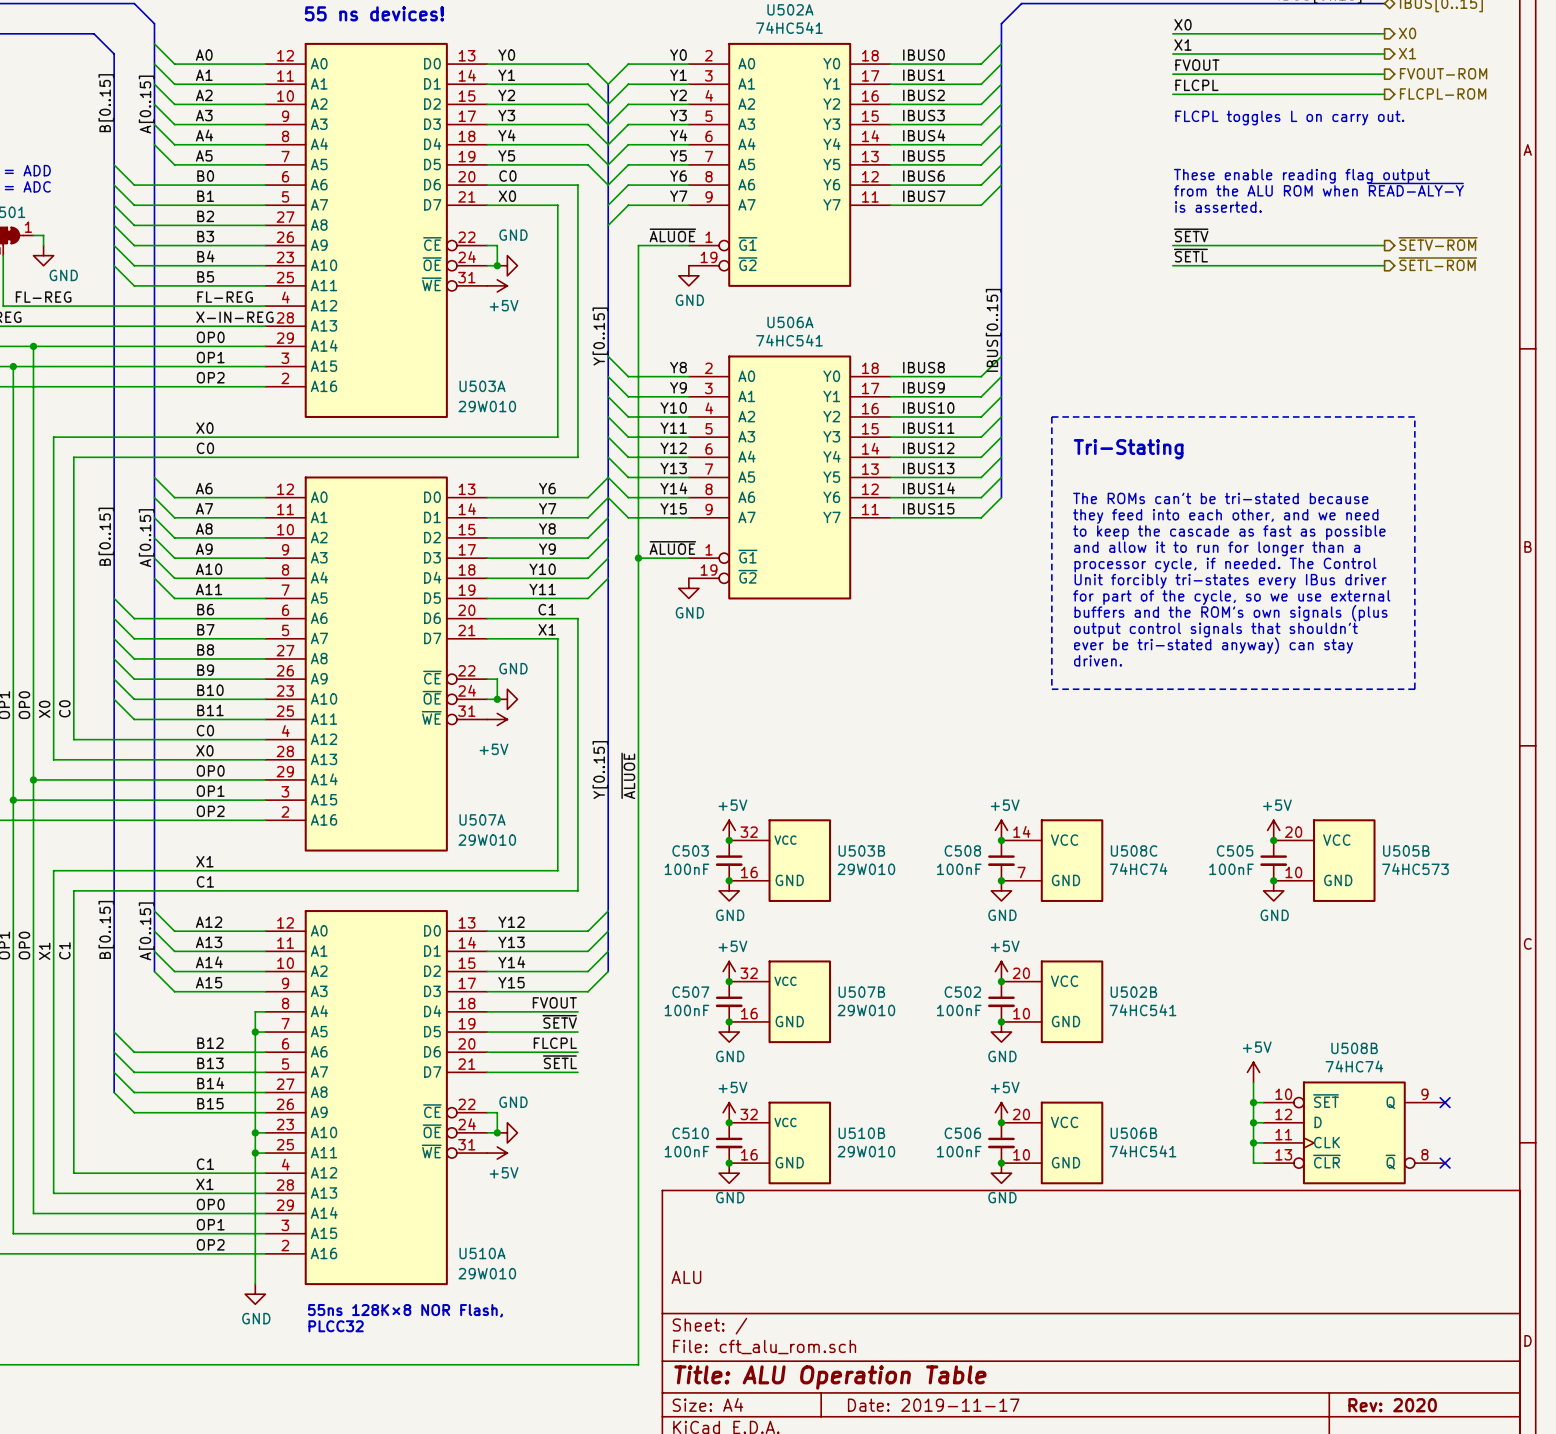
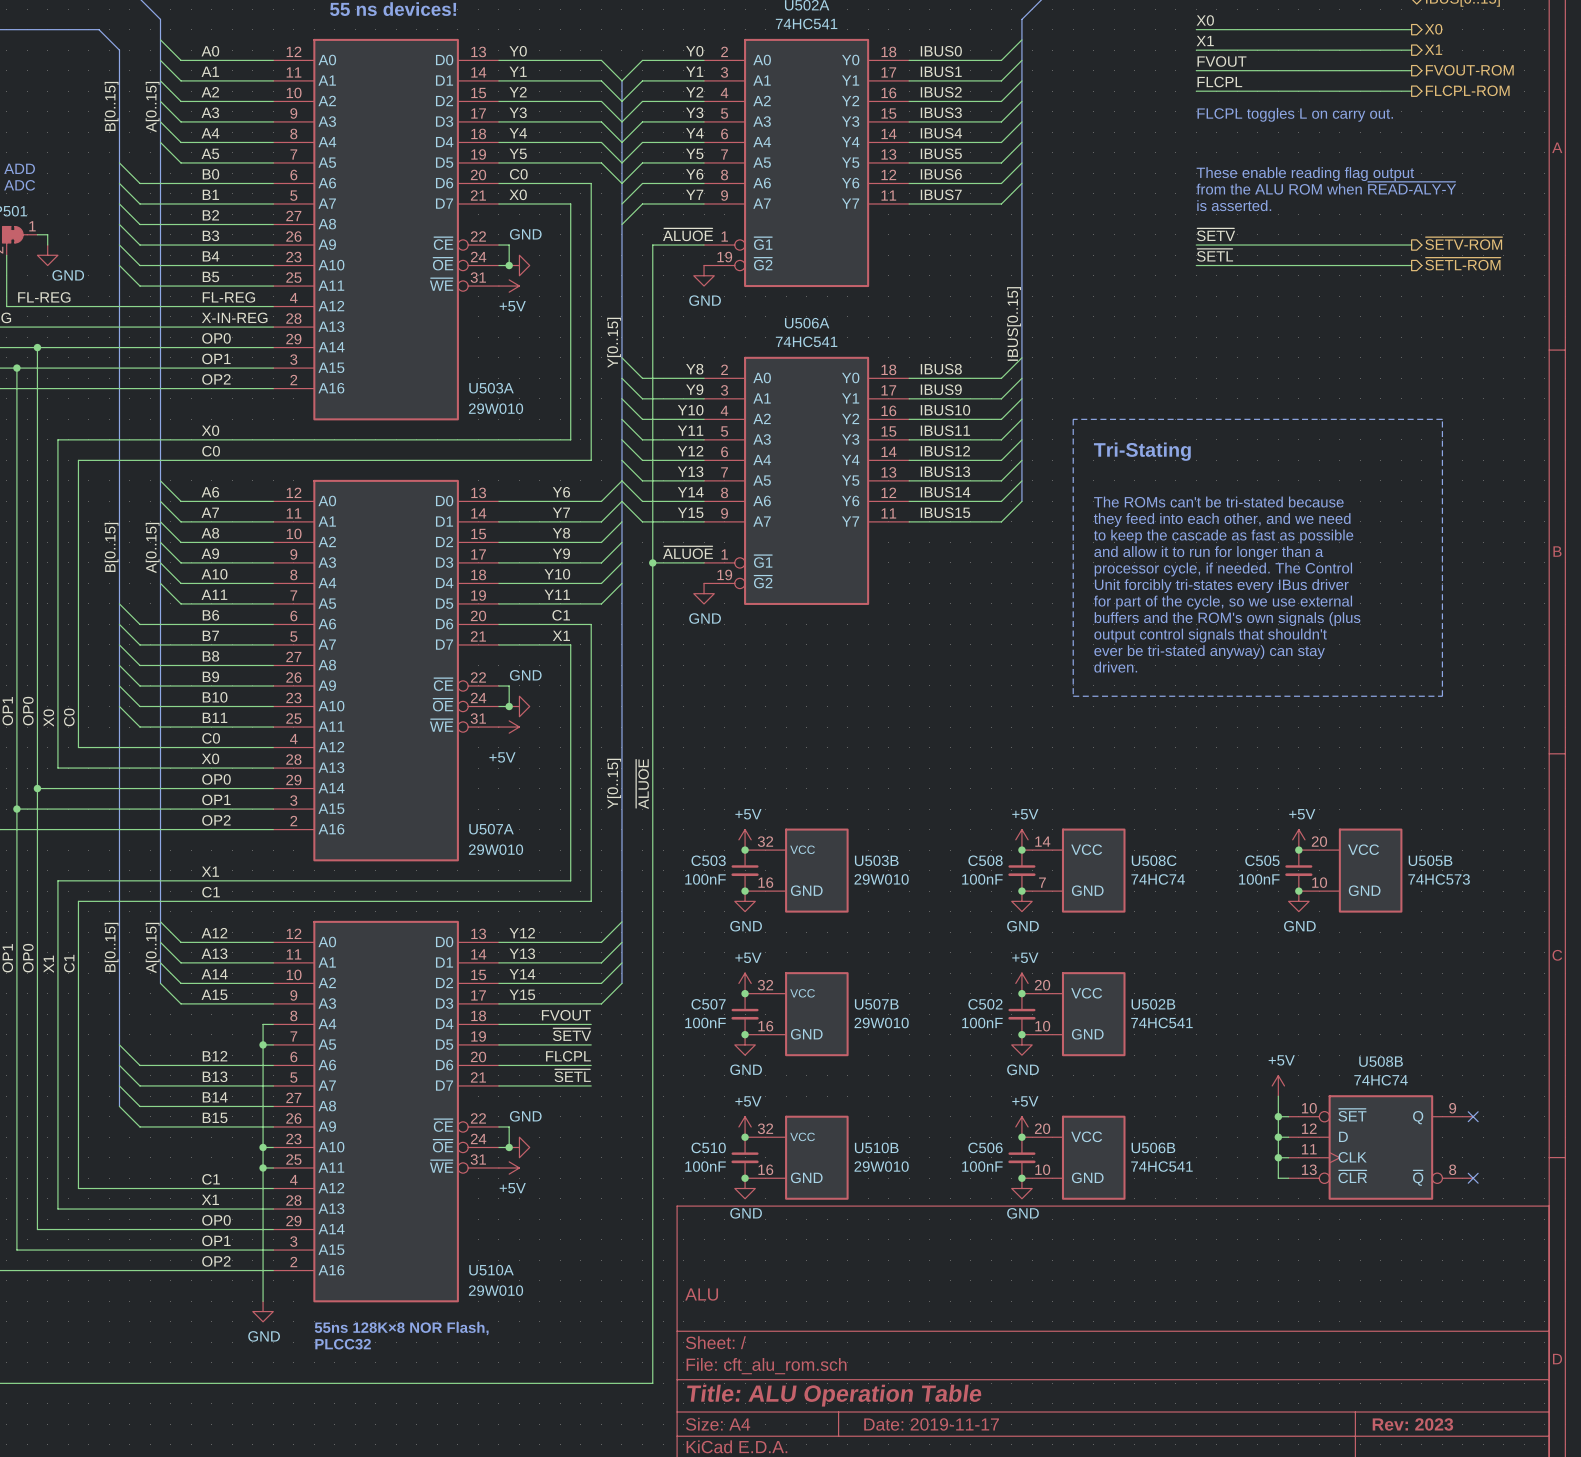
title block: Rev: 2020 (1392, 1405) -> Rev: 2023 (1412, 1424)

